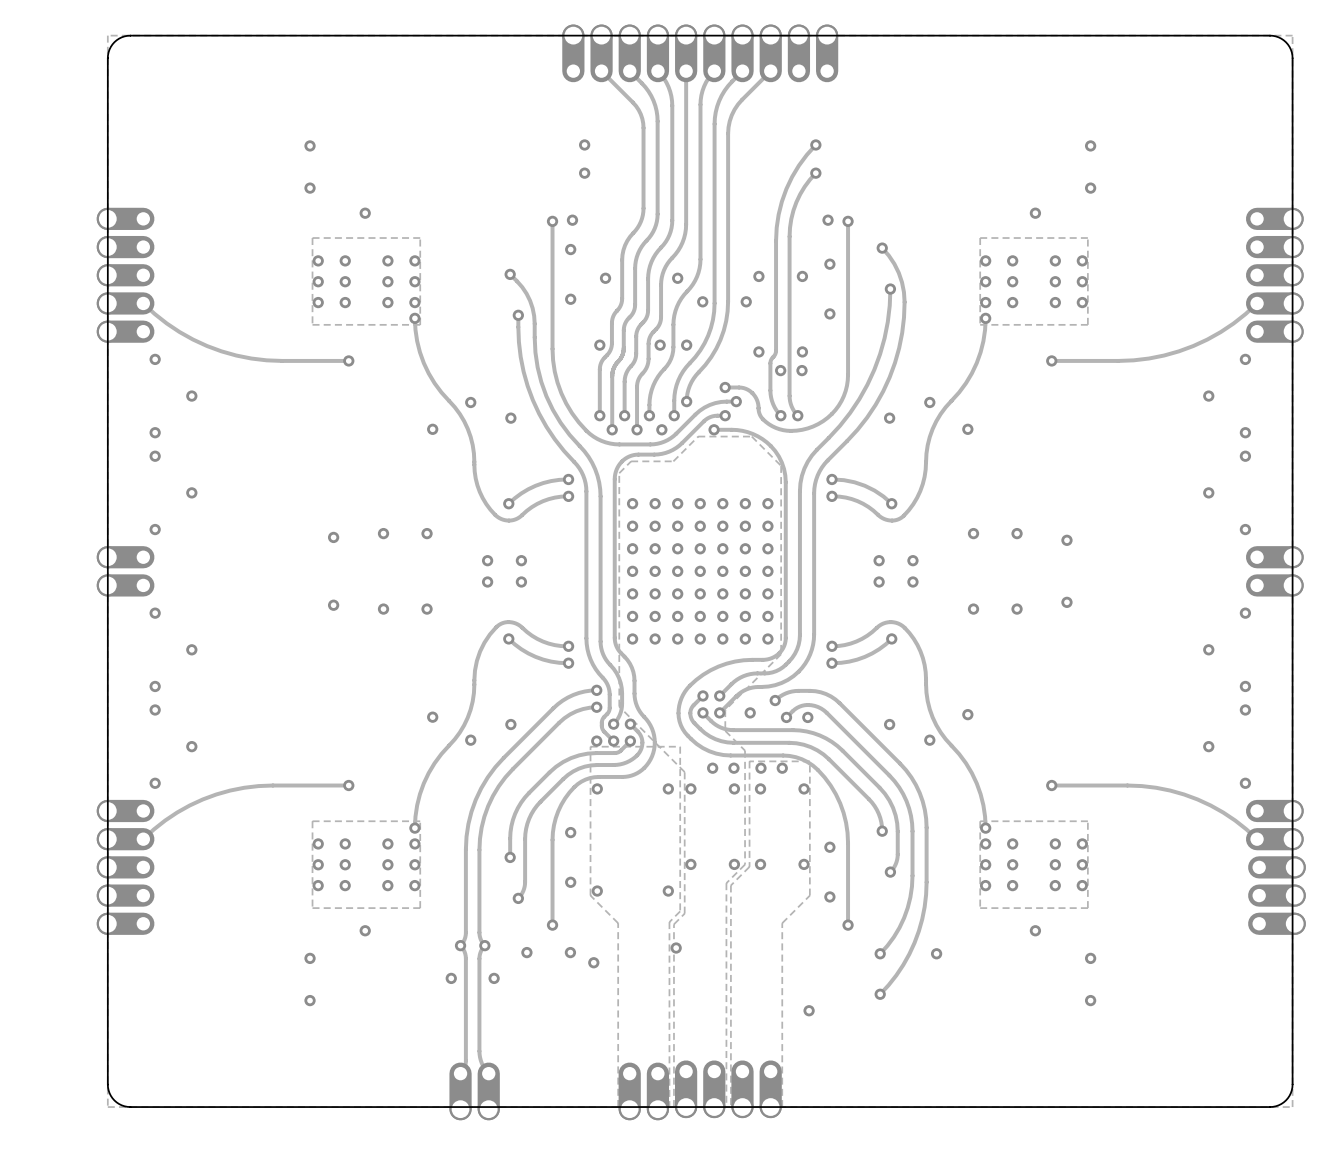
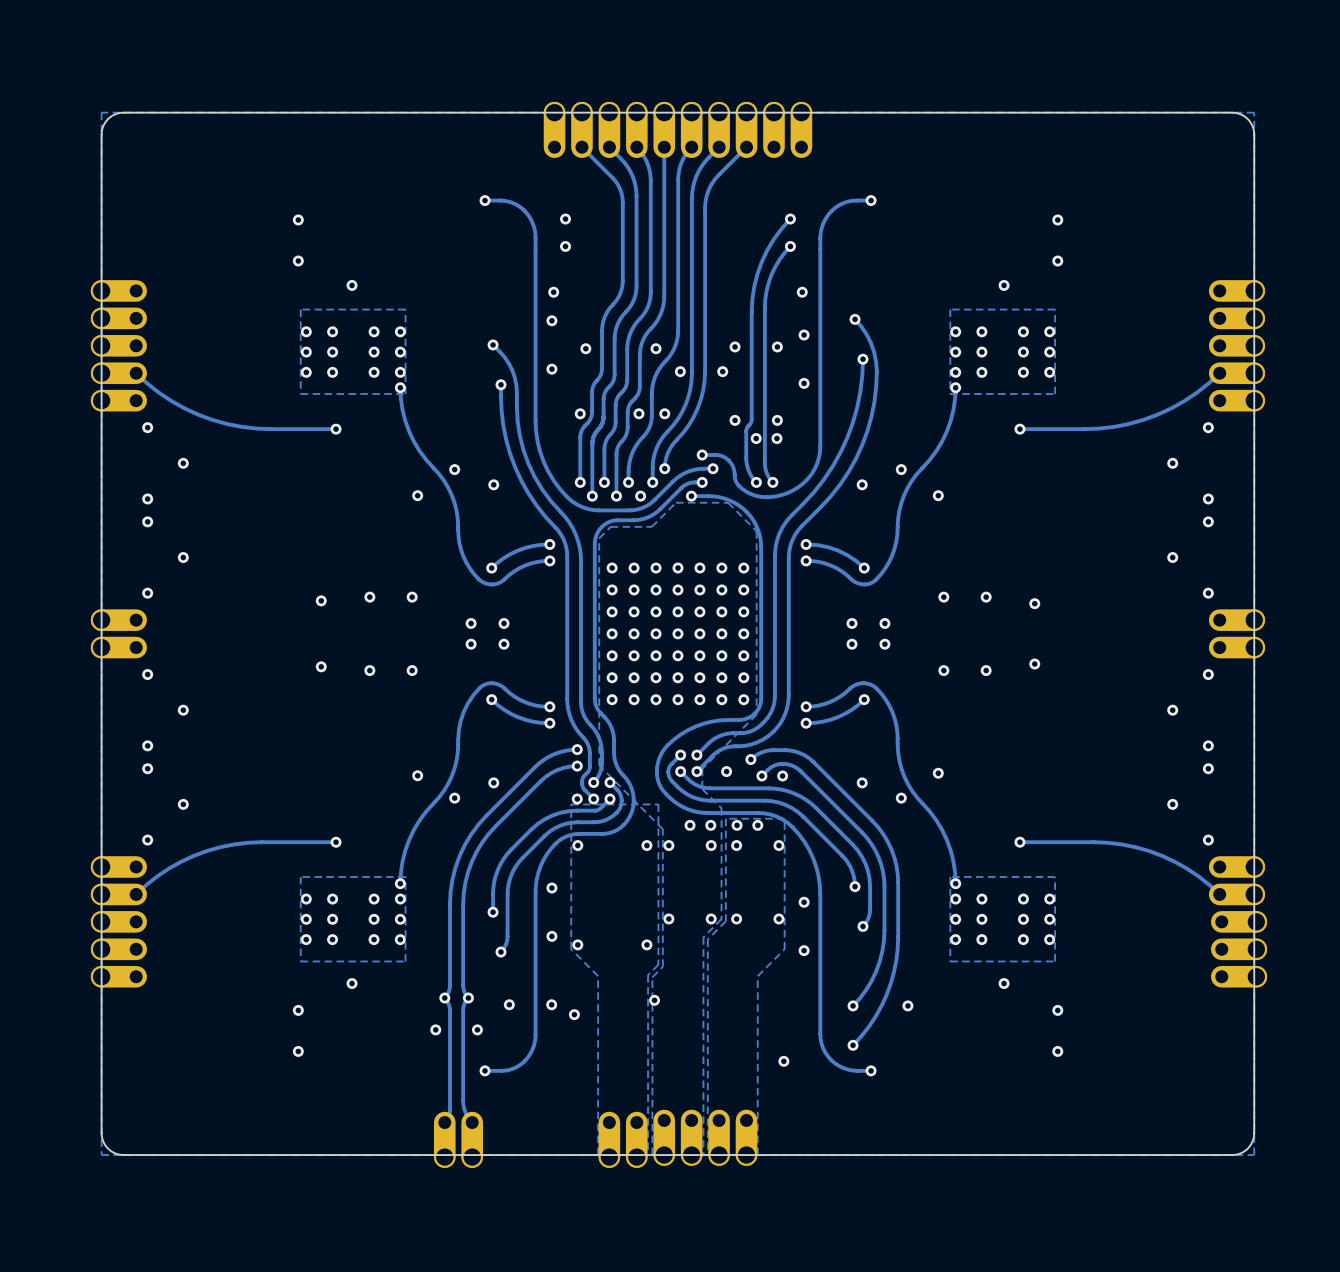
track: (552, 221) (552, 348) (554, 371) (566, 403) (586, 430) -> (485, 200) (503, 200) (516, 204) (526, 213) (533, 226) (535, 237) (536, 431) (540, 452) (548, 471) (567, 497)
via position: (552, 221) -> (485, 200)
track: (848, 221) (847, 380) (843, 396) (831, 413) -> (871, 200) (849, 201) (837, 206) (826, 216) (821, 231) (820, 451) (816, 464) (806, 480)
via position: (848, 221) -> (871, 200)
track: (817, 769) (835, 794) (846, 822) (848, 842) (848, 925) -> (792, 827) (804, 841) (813, 857) (819, 885) (821, 1043) (827, 1056) (839, 1066) (854, 1070) (871, 1070)
track: (574, 787) (561, 804) (553, 825) (552, 925) -> (555, 843) (540, 865) (535, 885) (533, 1045) (527, 1058) (516, 1067) (504, 1070) (485, 1070)
via position: (552, 925) -> (485, 1070)
via position: (848, 925) -> (871, 1070)

